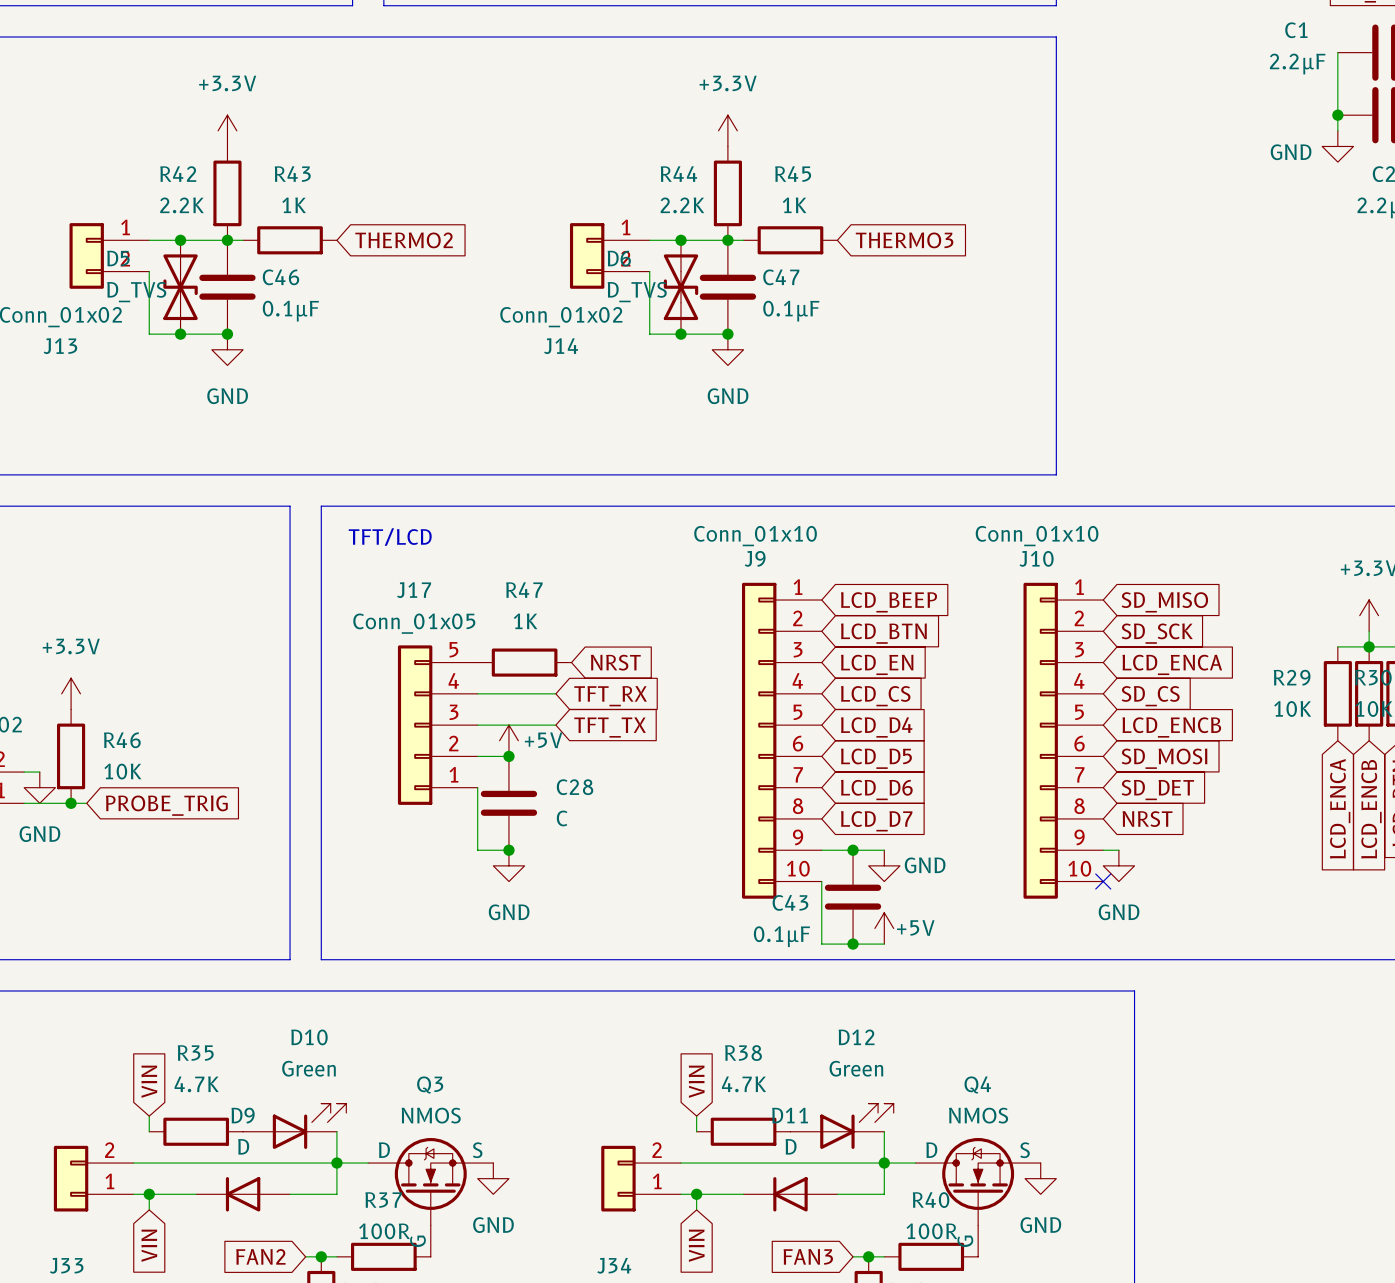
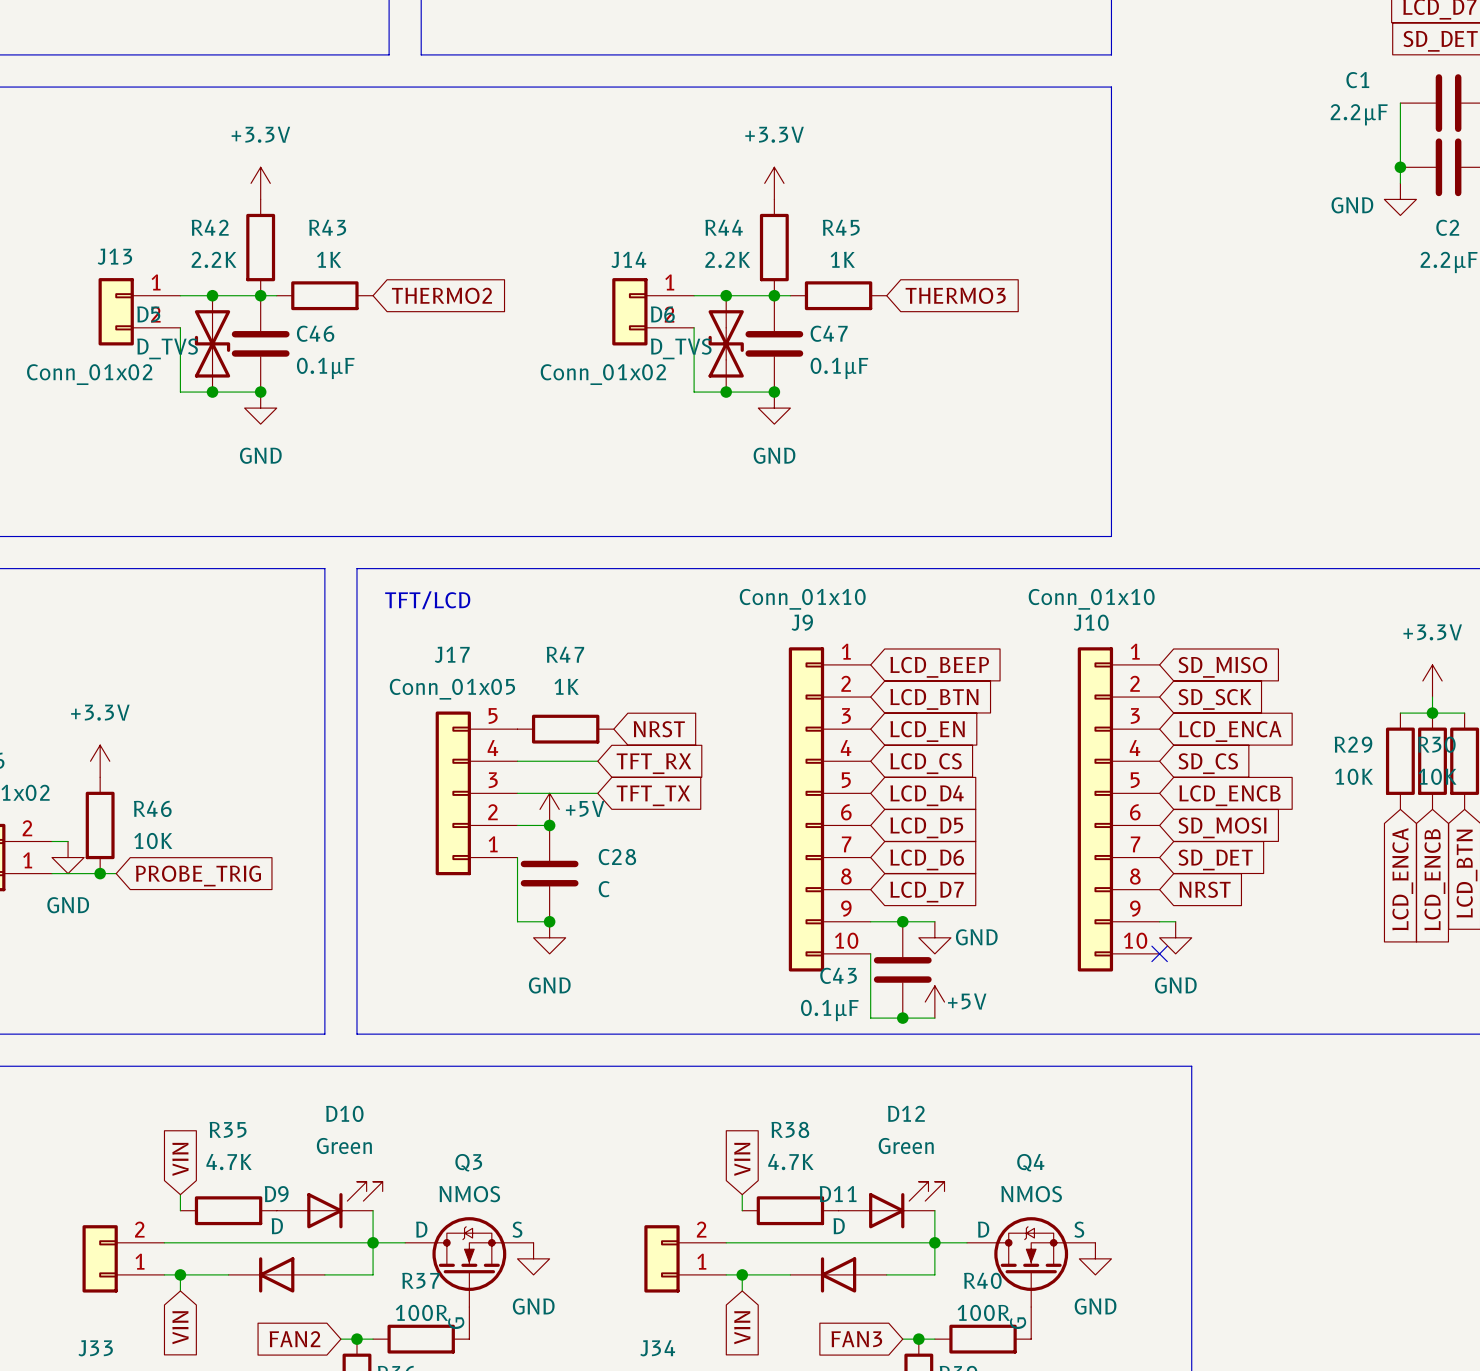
J13 name position: J13 (60, 346) -> J13 (114, 256)
J14 name position: J14 (561, 346) -> J14 (628, 259)

